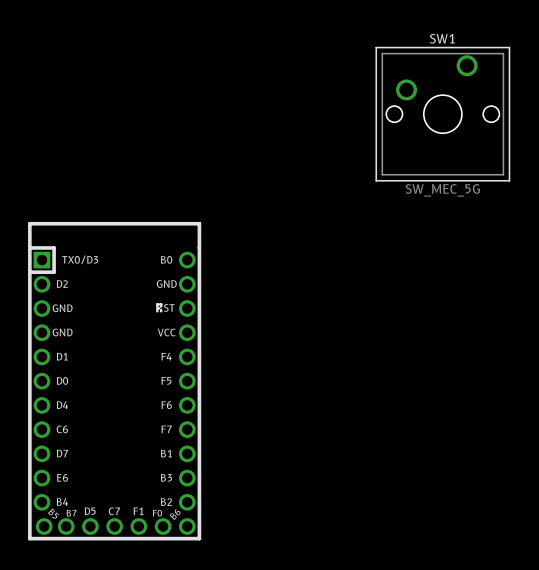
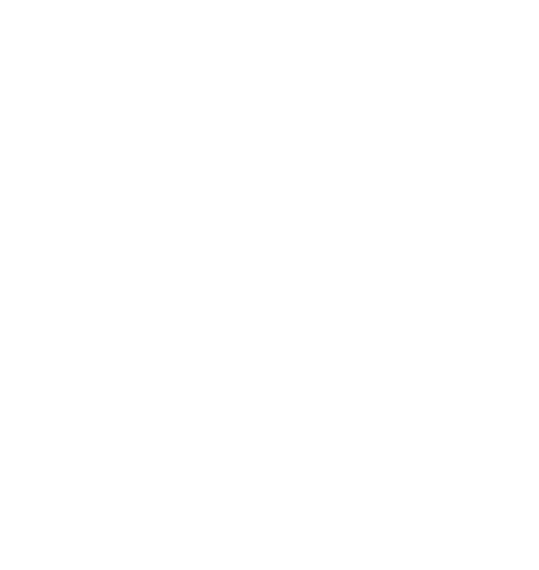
SW1: SW_MEC_5G (442, 114) -> none
part: (114, 381) -> none

